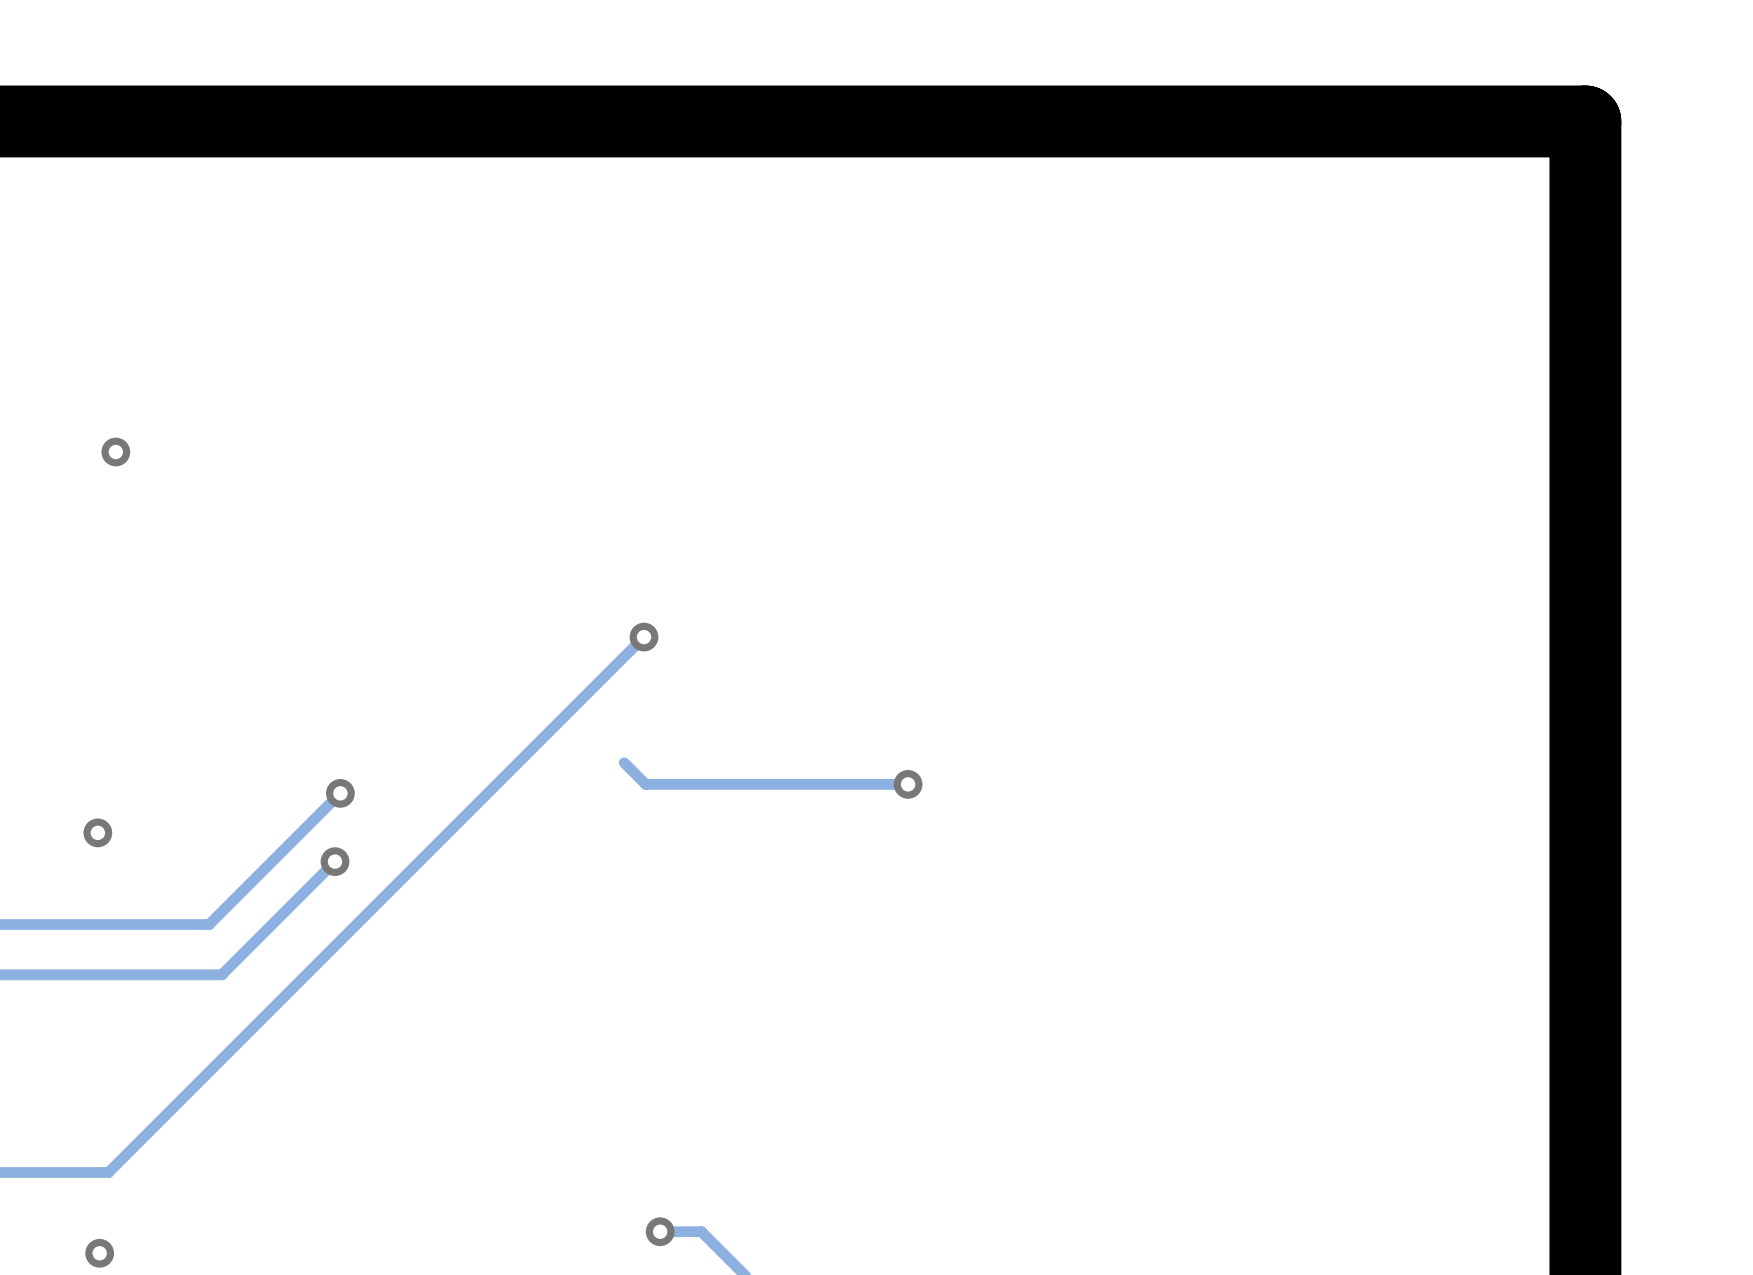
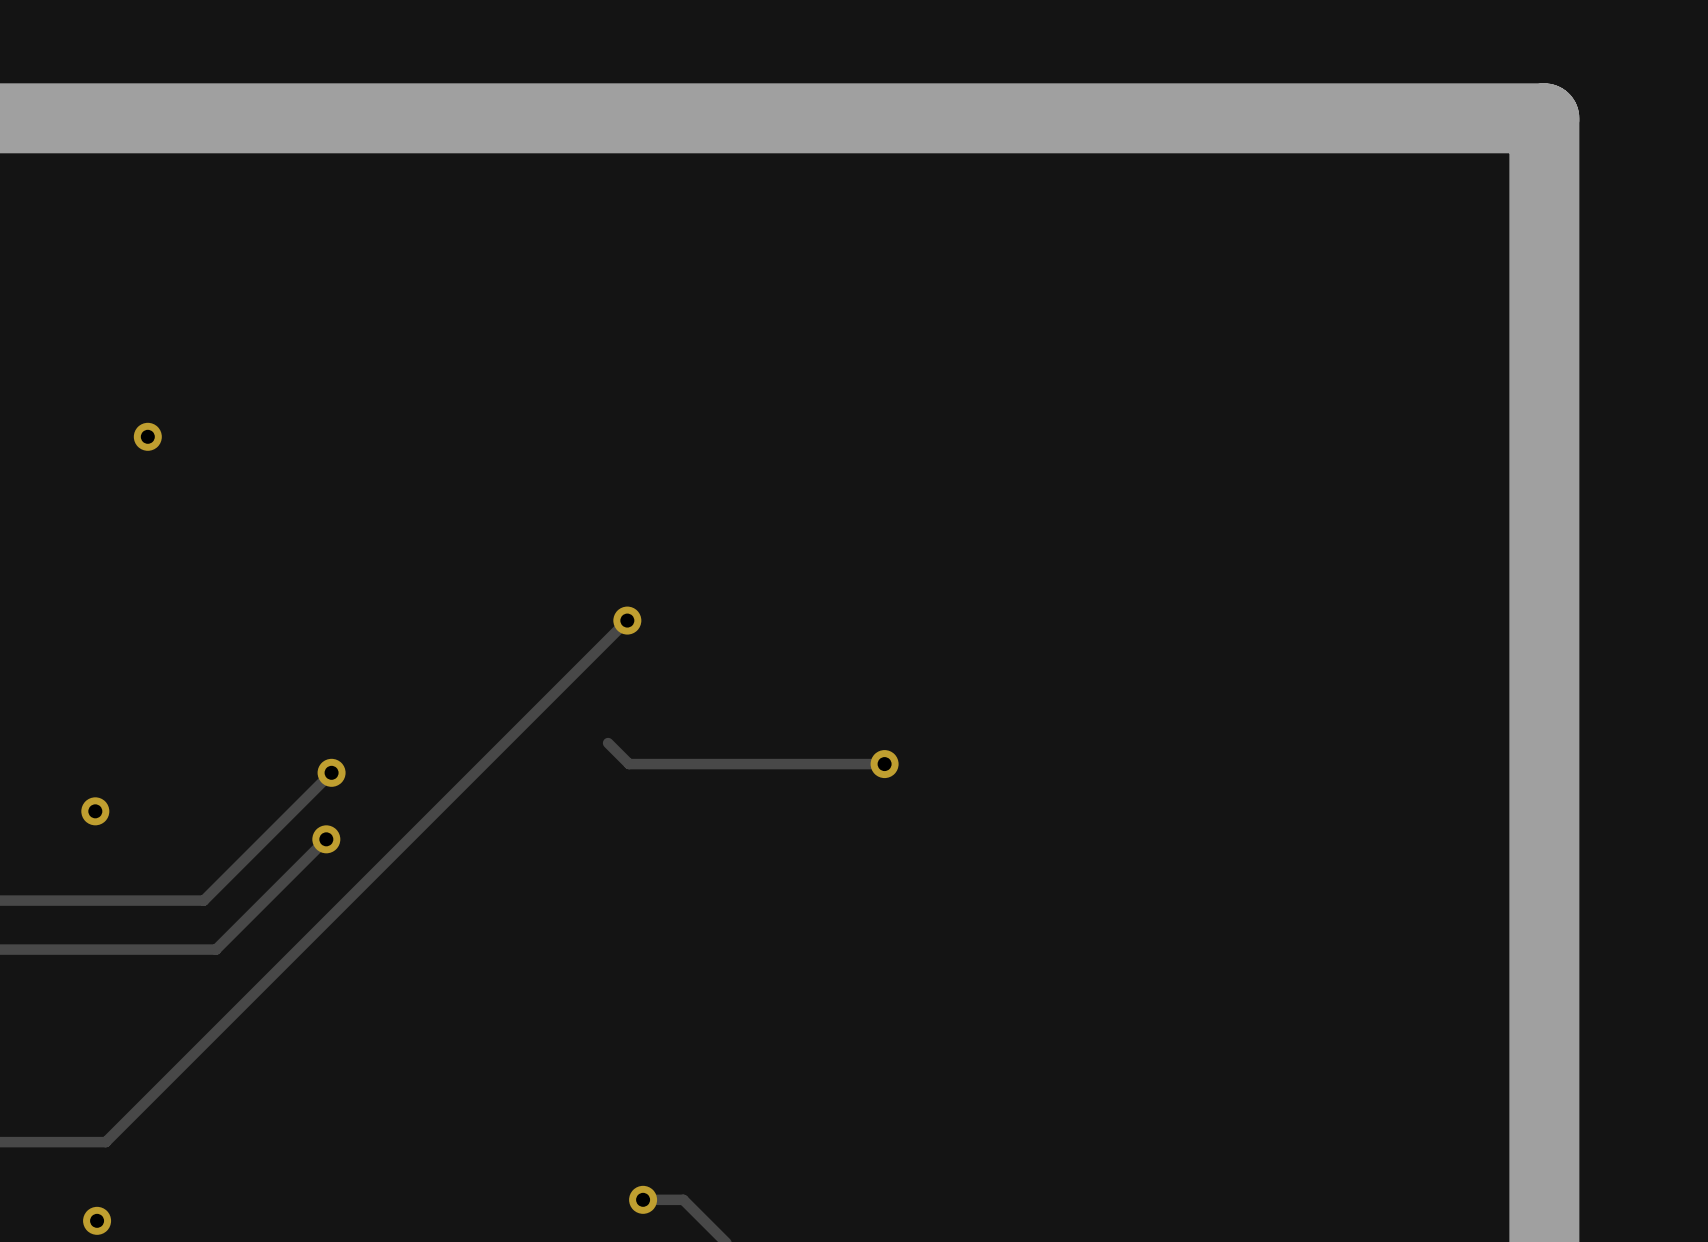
via position: (115, 452) -> (147, 436)

